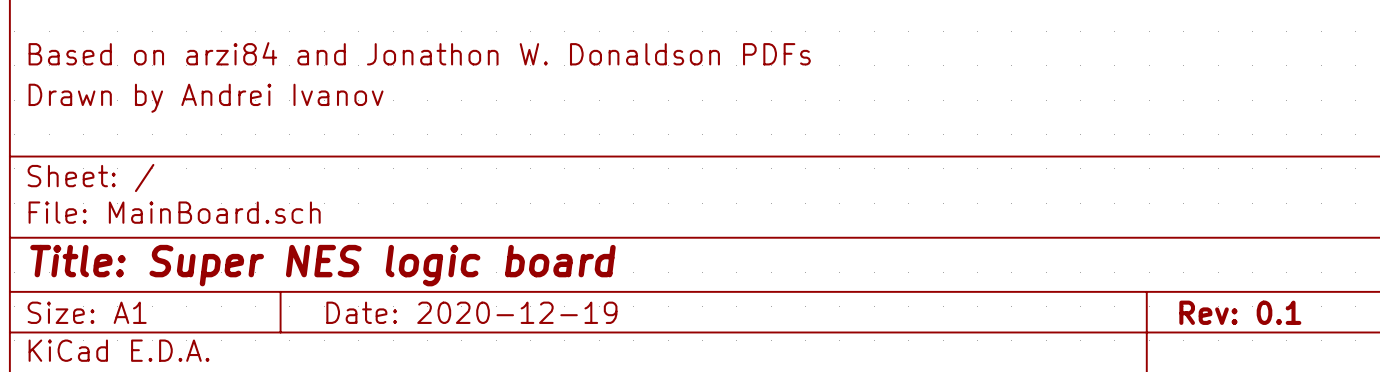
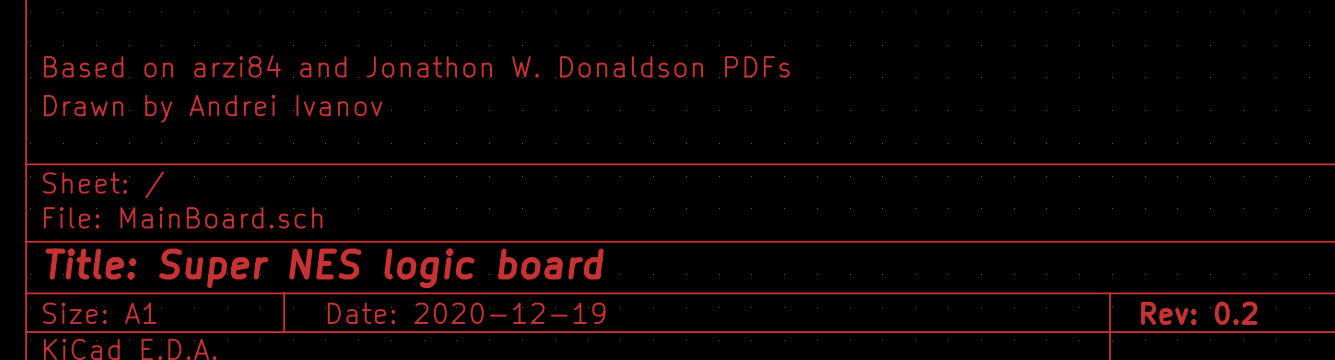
title block: Rev: 0.1 (1240, 312) -> Rev: 0.2 (1199, 313)

